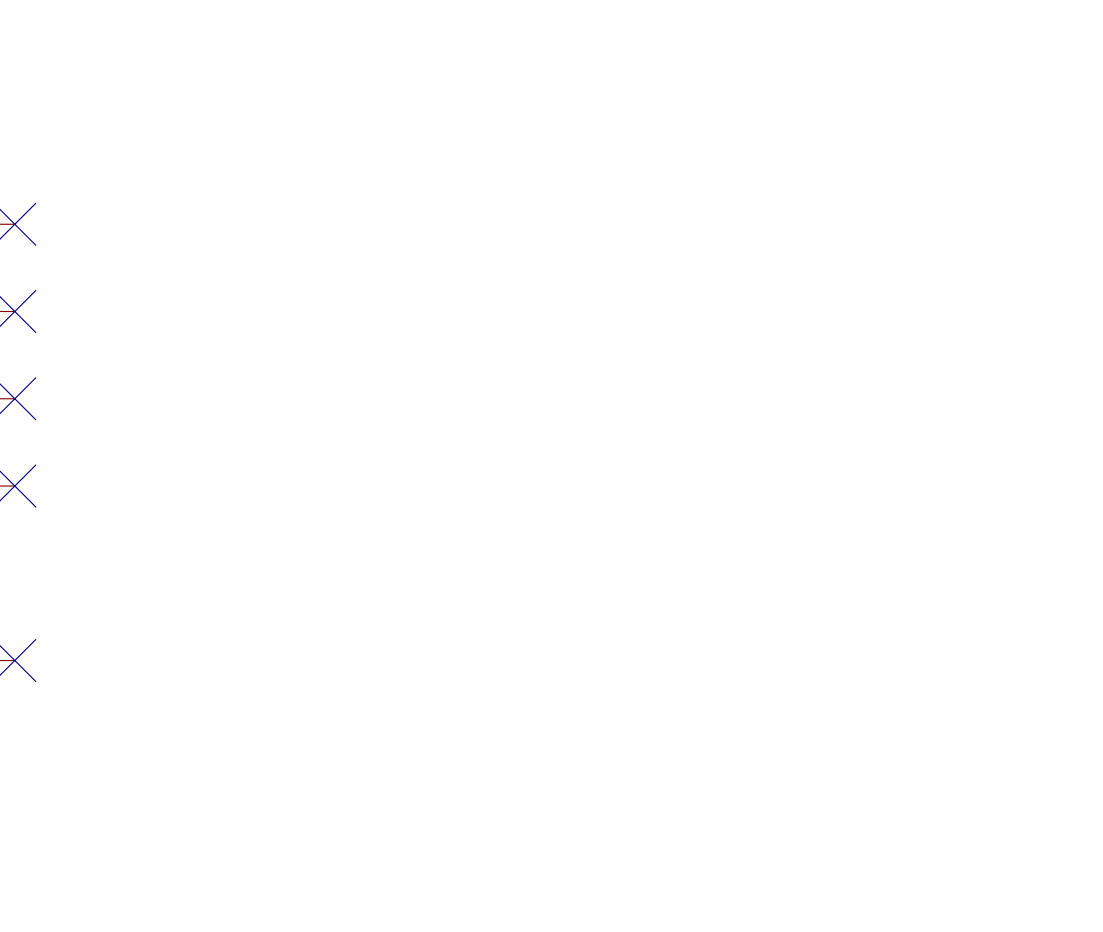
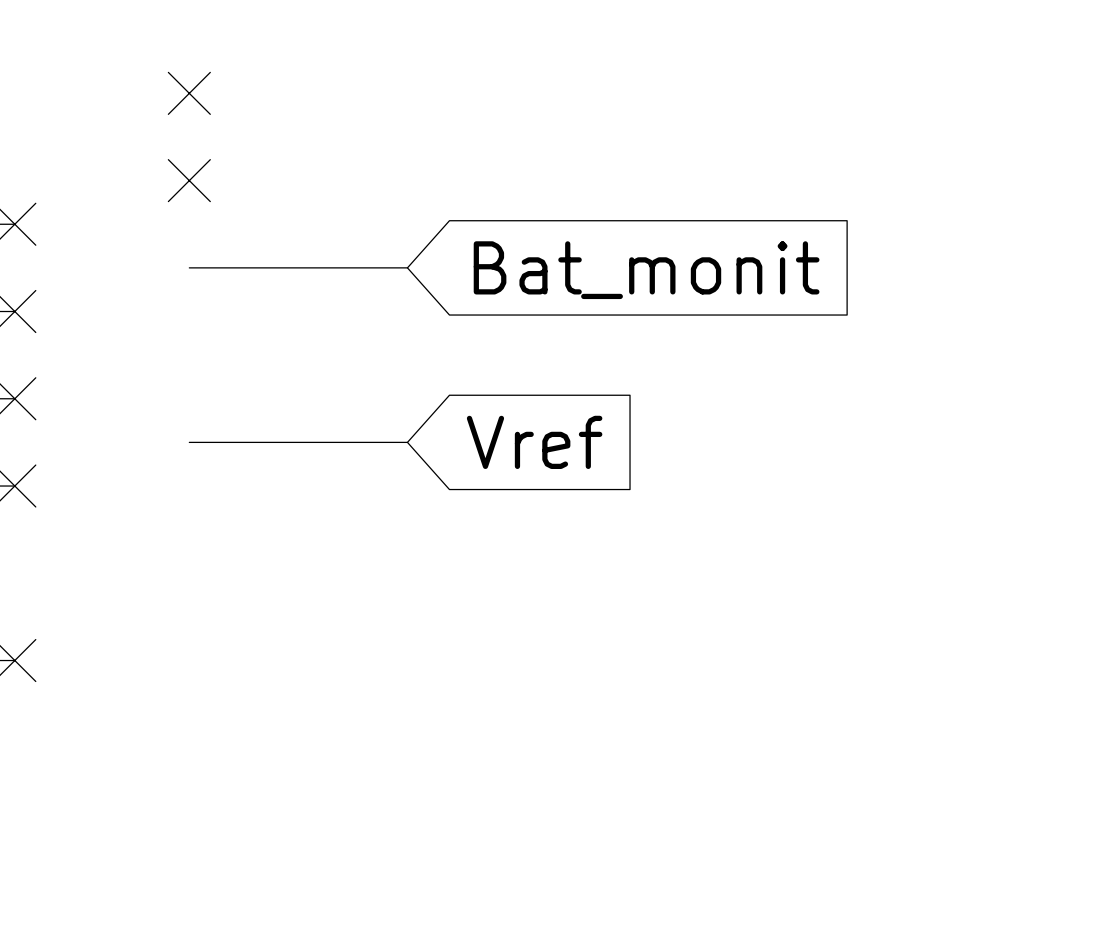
no-connect mark: none -> (189, 93)
no-connect mark: none -> (189, 180)
wire: none -> (189, 267) (407, 267)
global label: none -> Bat_monit (646, 270)
wire: none -> (189, 442) (407, 442)
global label: none -> Vref (534, 442)

